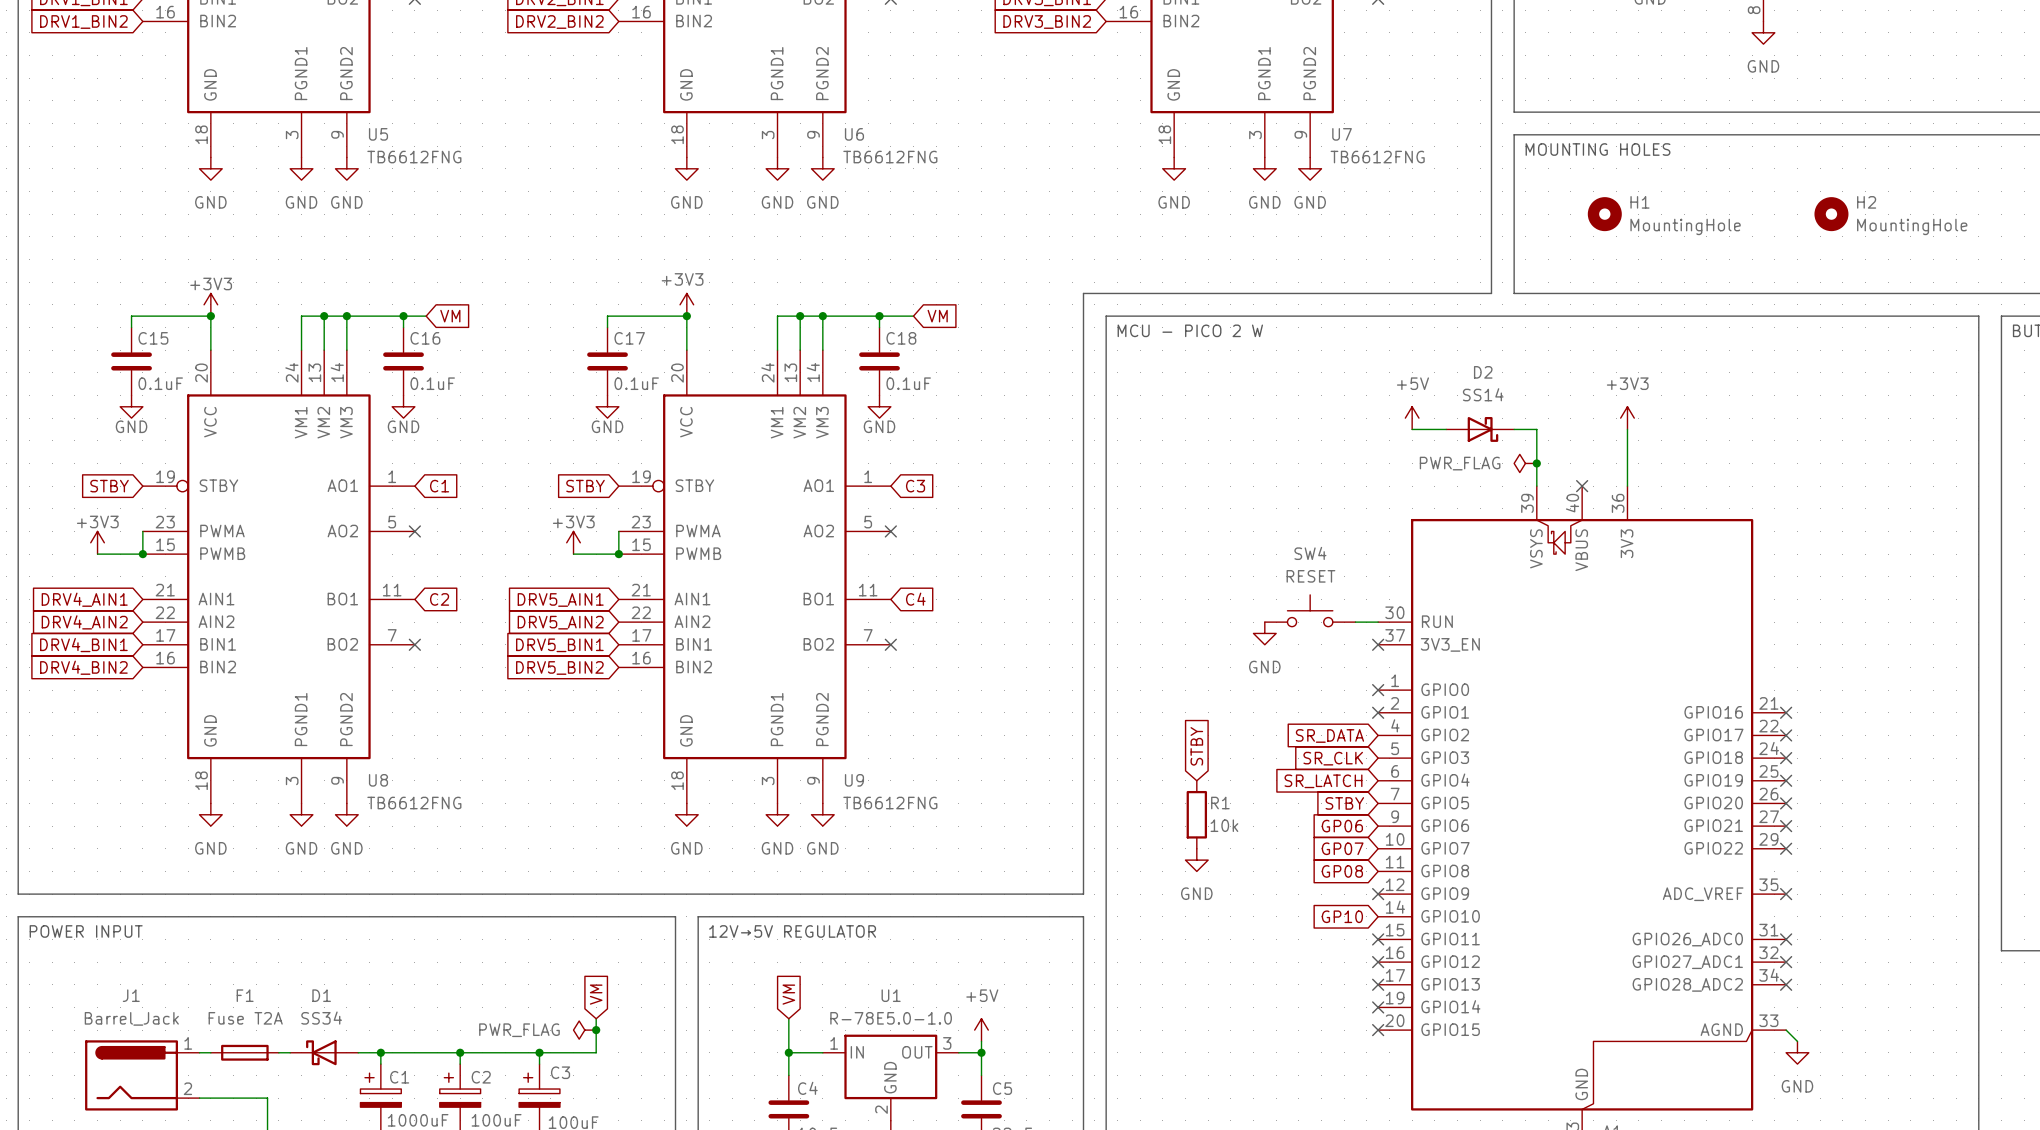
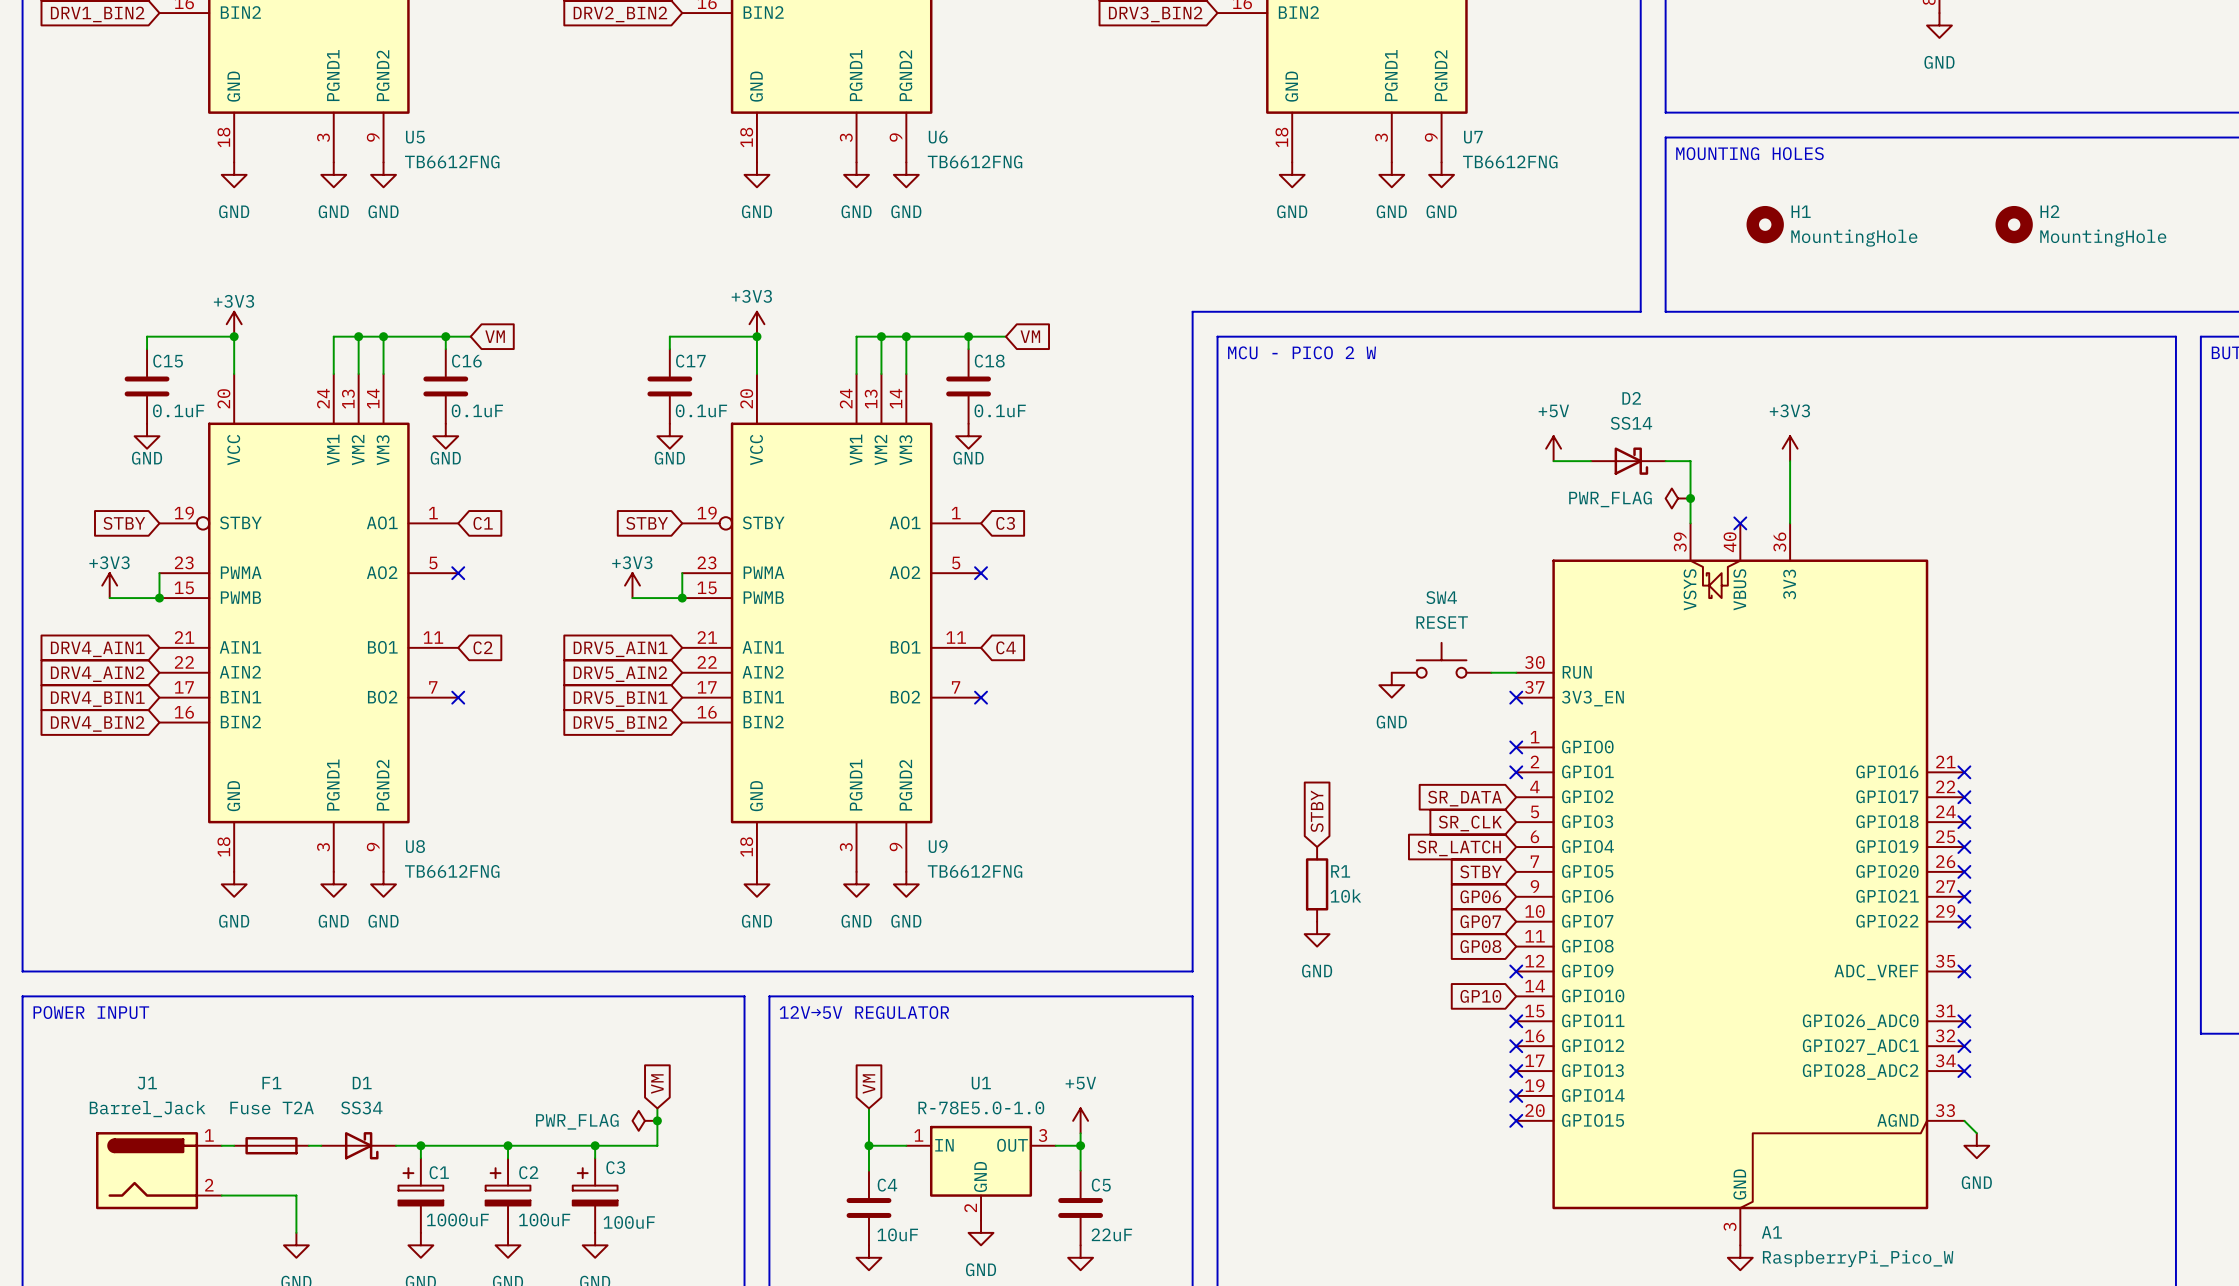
D1 rotation: 0° (321, 1052) -> 180° (361, 1145)

